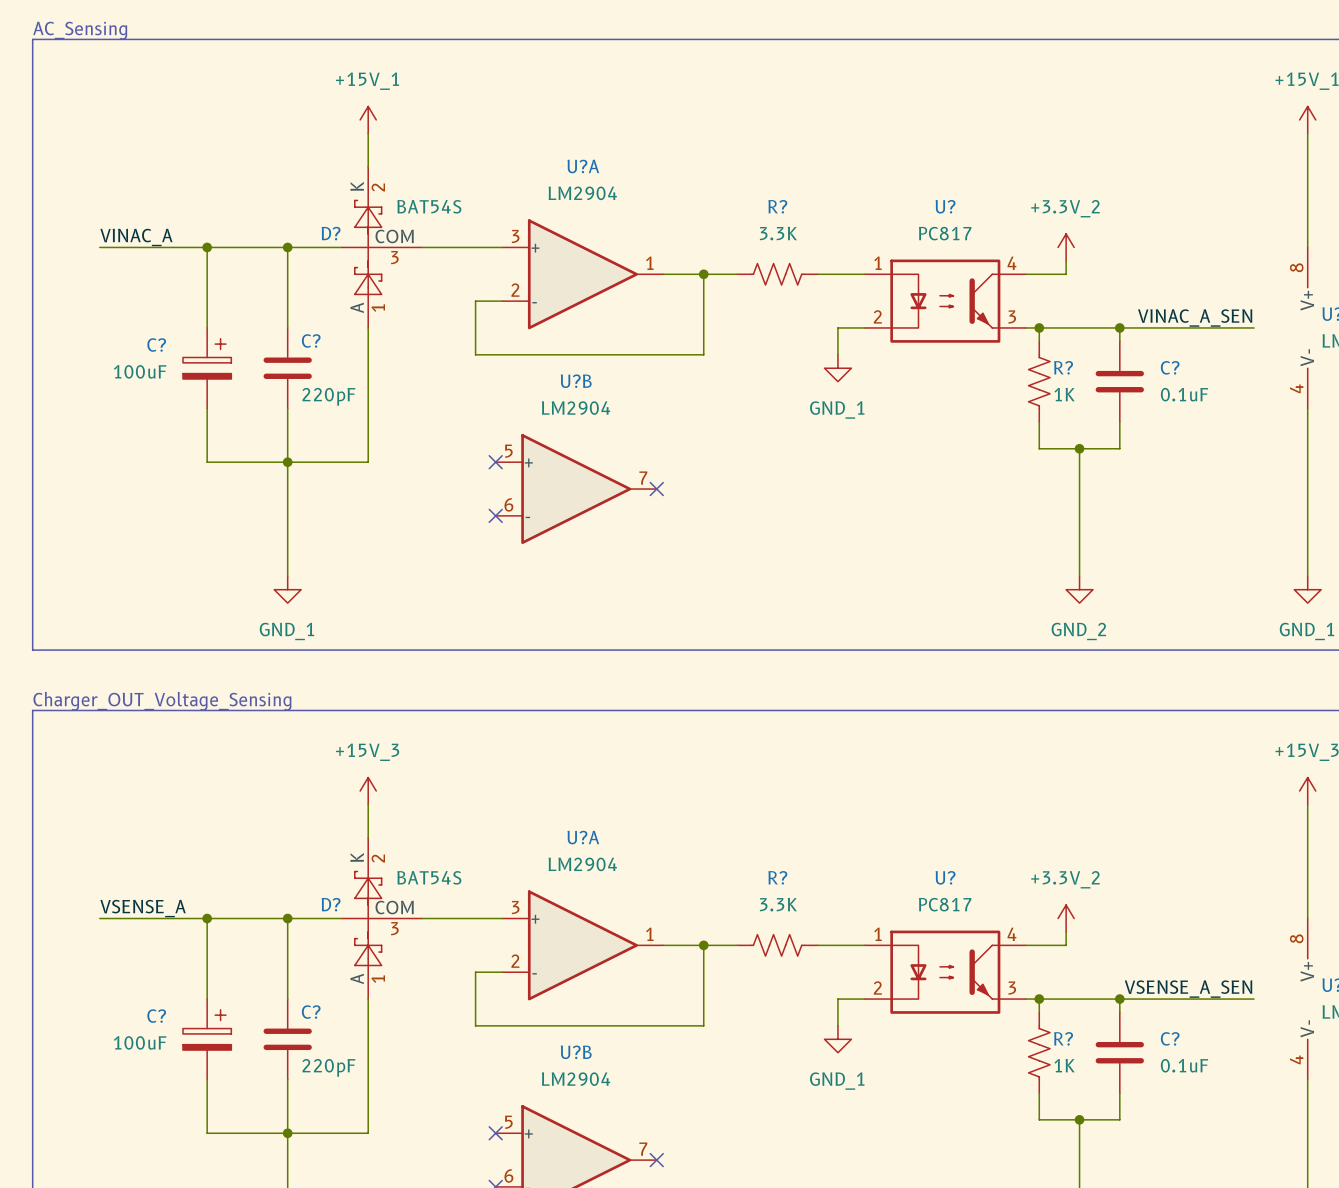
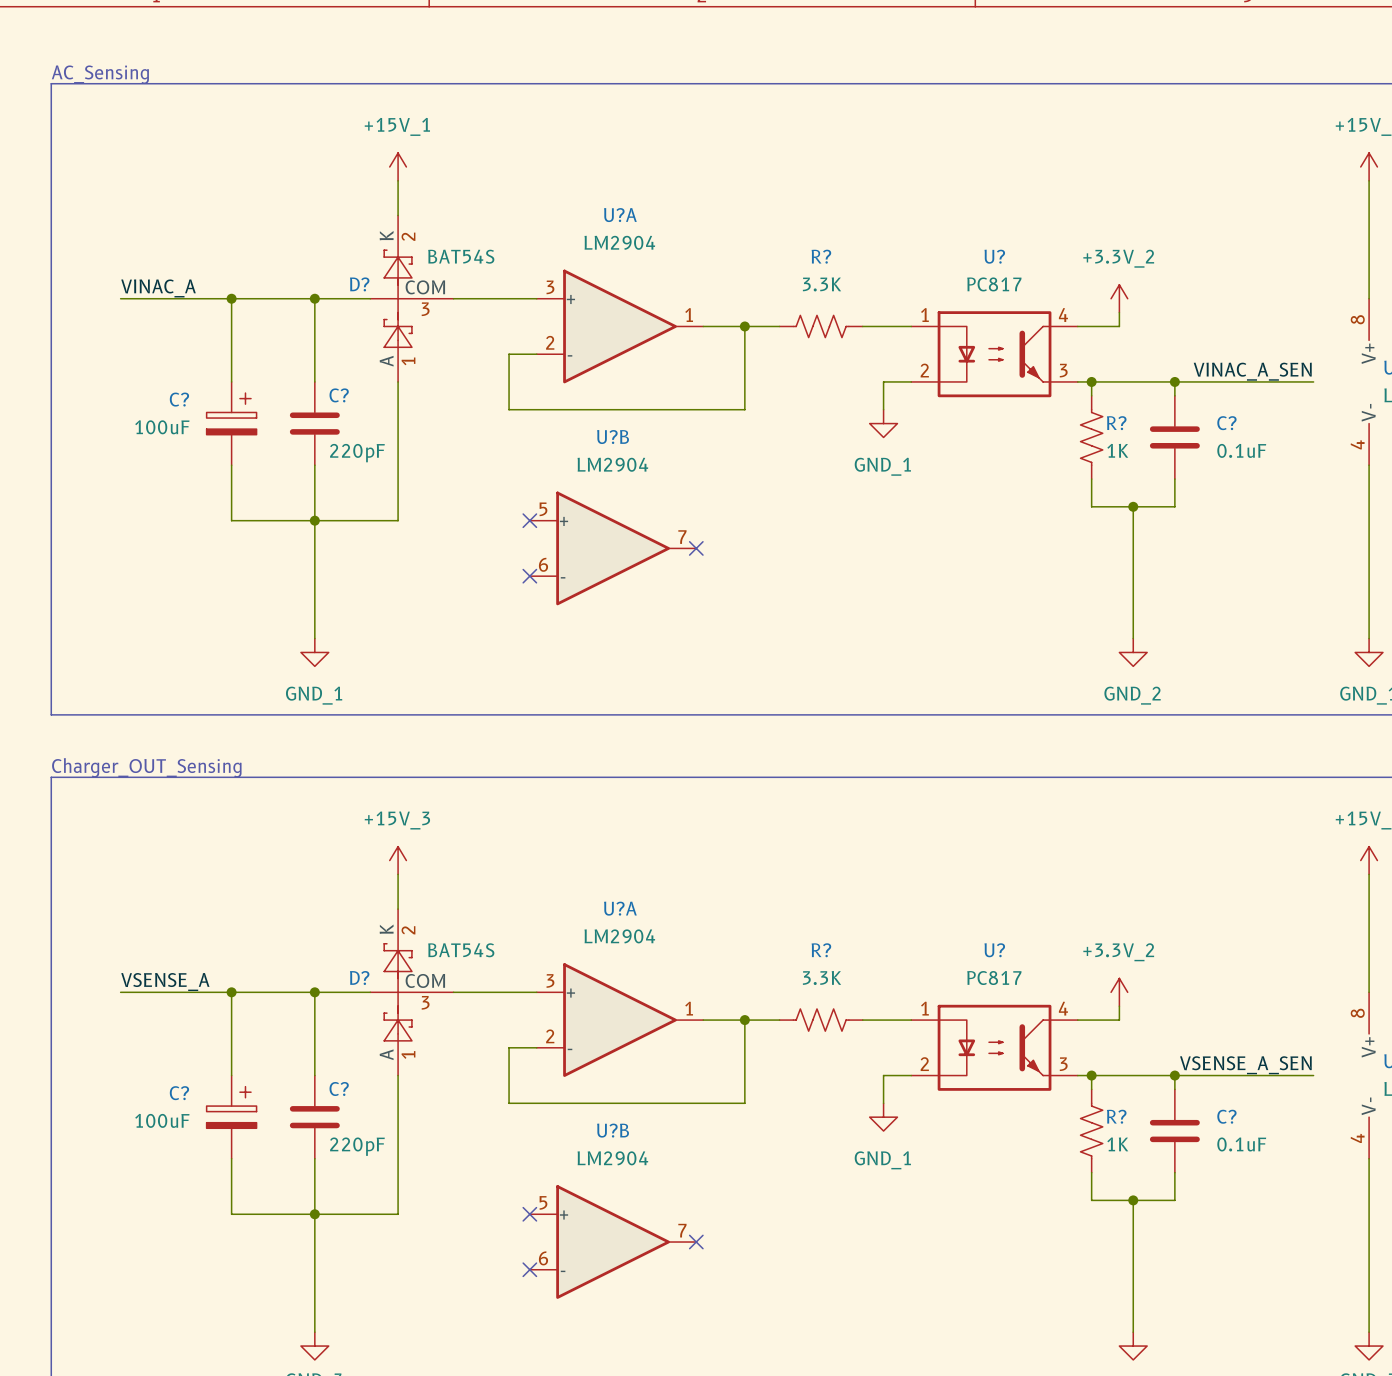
text: Charger_OUT_Voltage_Sensing (162, 701) -> Charger_OUT_Sensing (146, 767)

